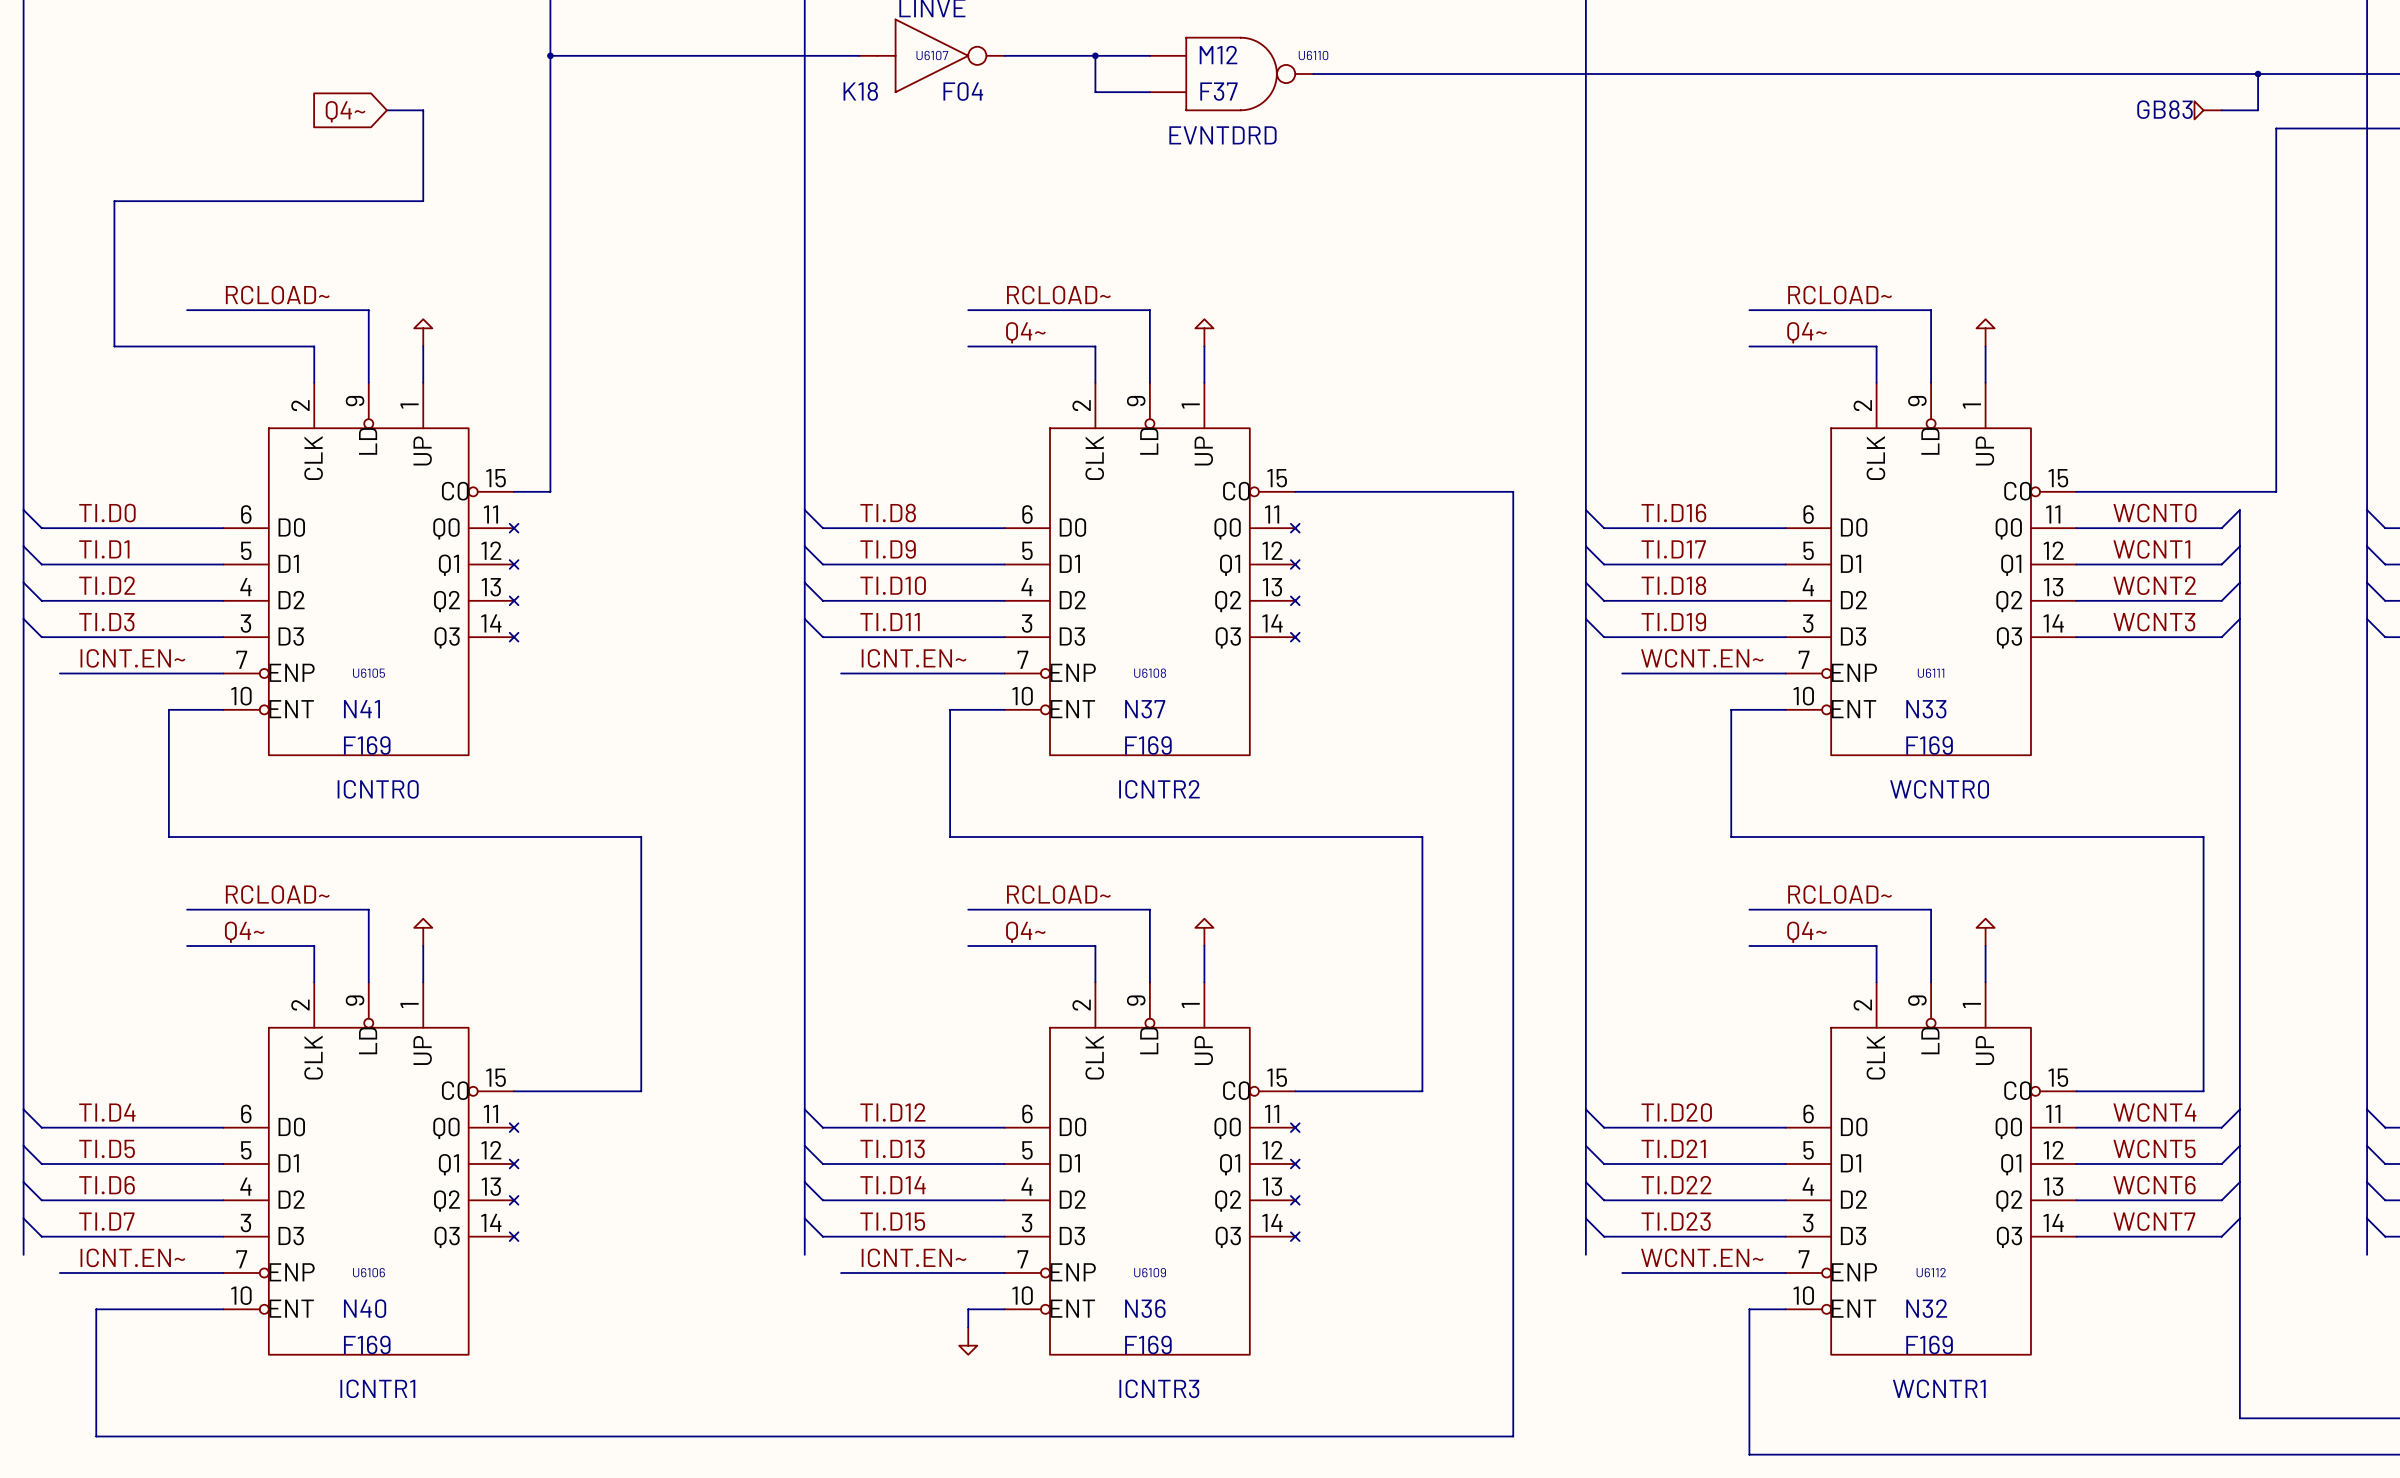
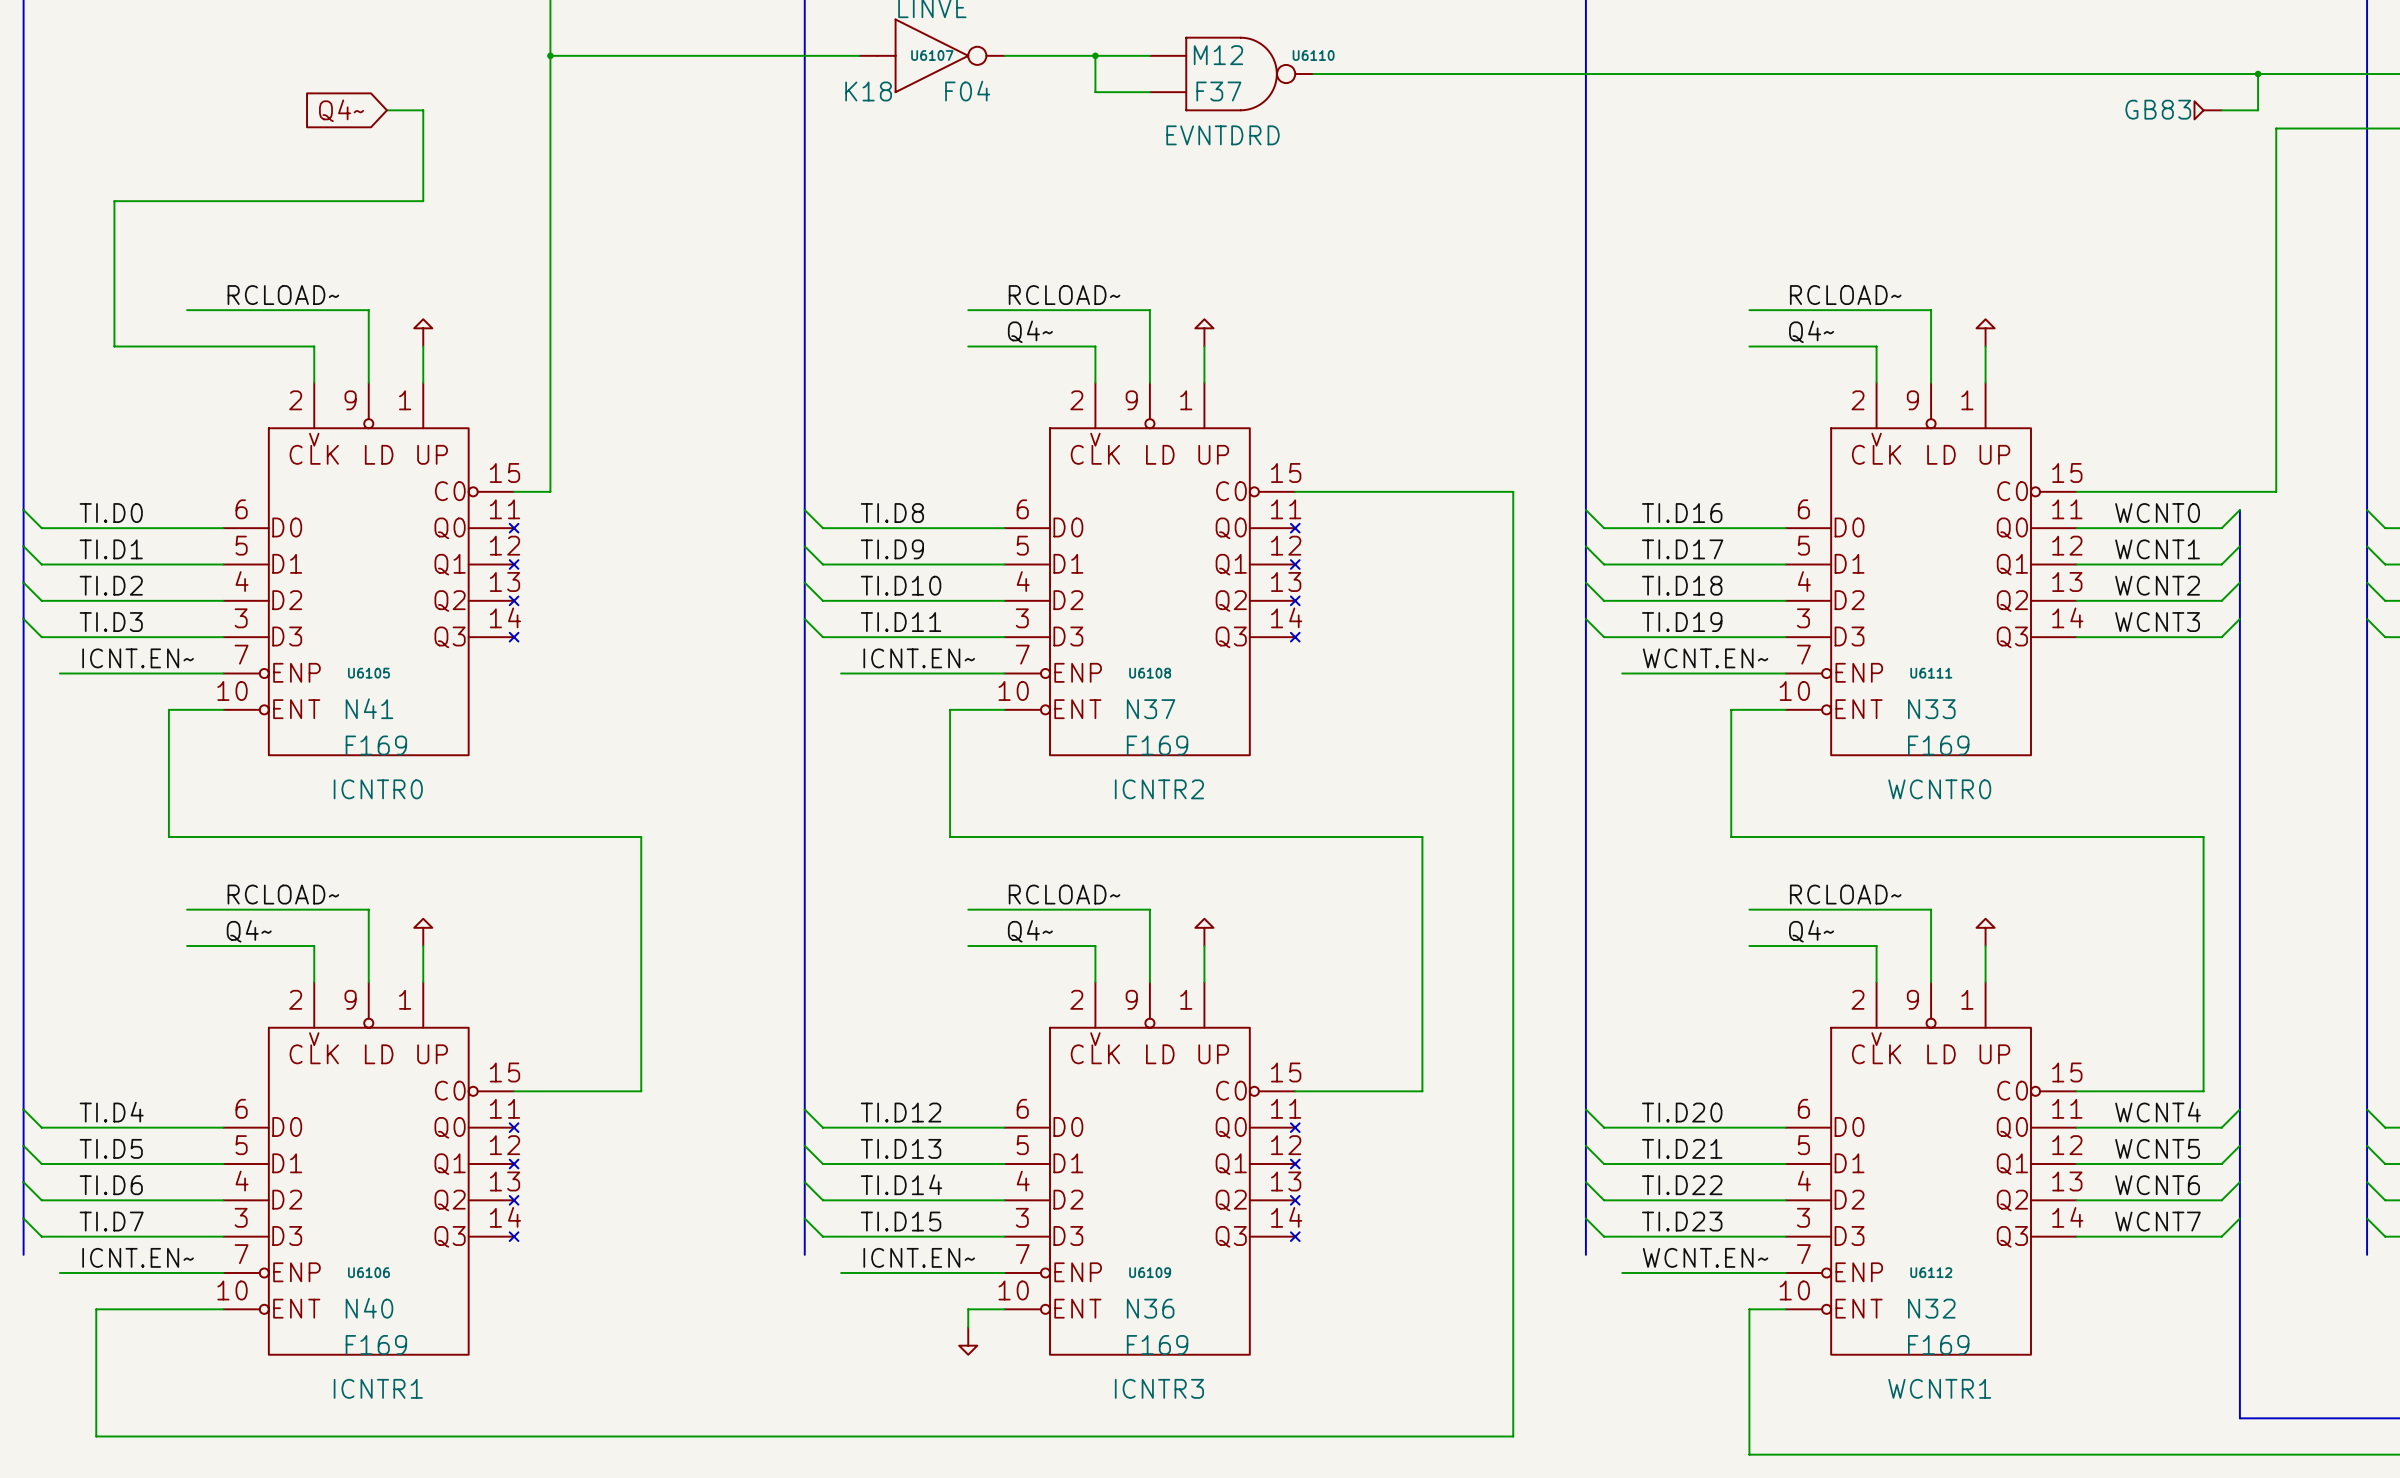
U6105 symbol: [223, 382, 515, 756] -> [223, 382, 515, 756]
U6108 symbol: [1004, 382, 1296, 756] -> [1004, 382, 1296, 756]
U6111 symbol: [1785, 382, 2077, 756] -> [1785, 382, 2077, 756]
U6106 symbol: [223, 982, 515, 1355] -> [223, 982, 515, 1355]
U6109 symbol: [1004, 982, 1296, 1355] -> [1004, 982, 1296, 1355]
U6112 symbol: [1785, 982, 2077, 1355] -> [1785, 982, 2077, 1355]

